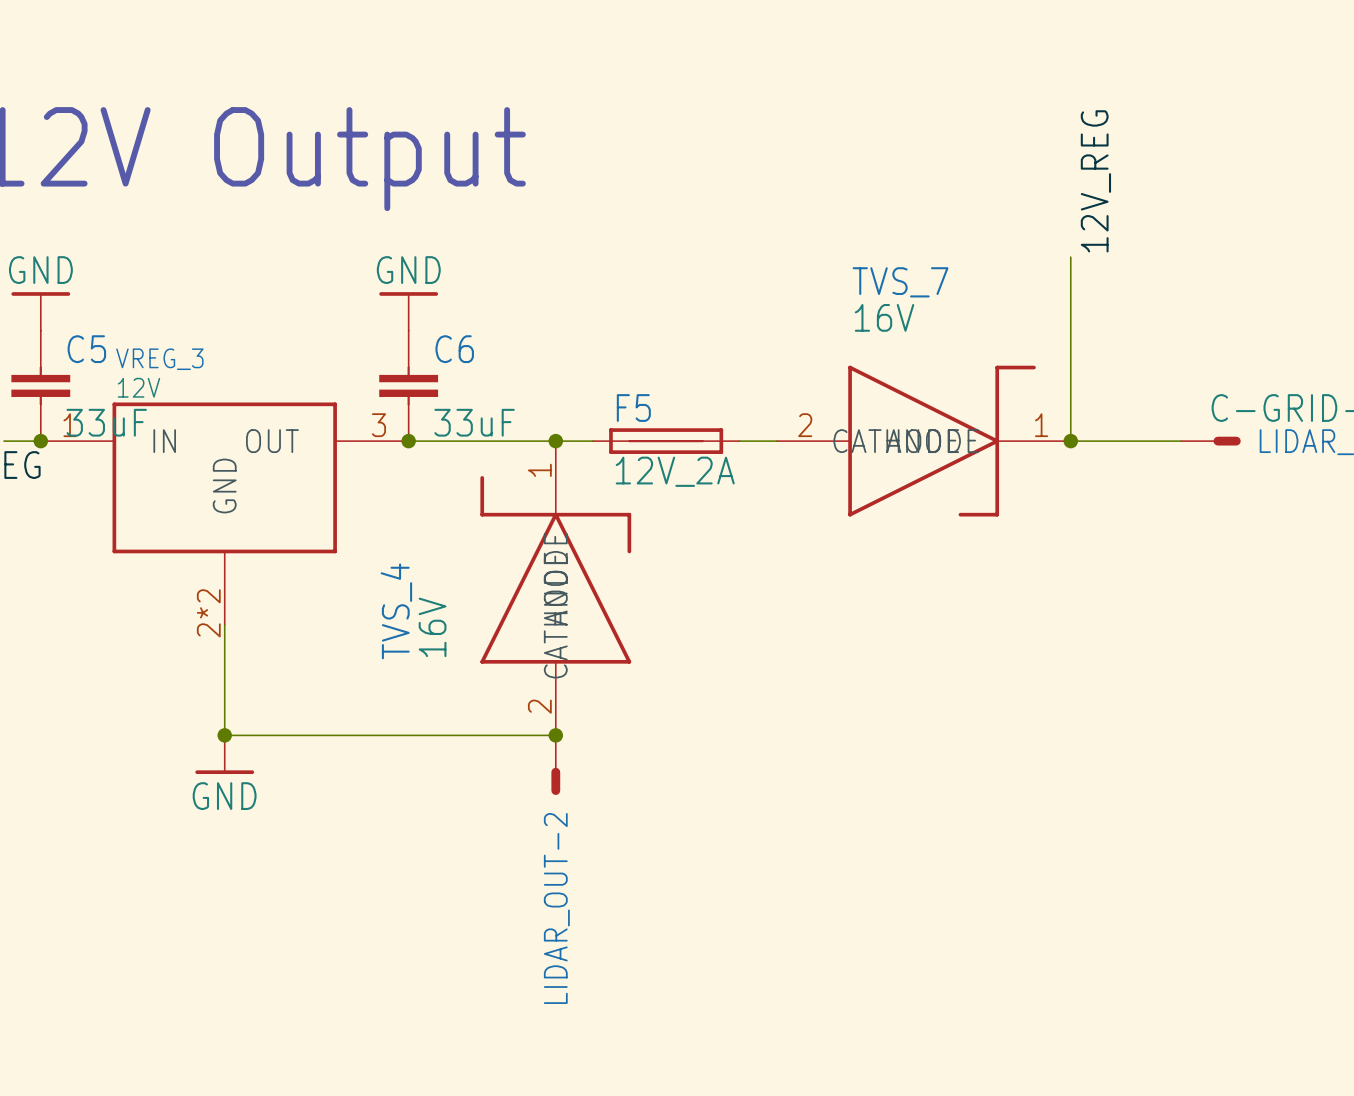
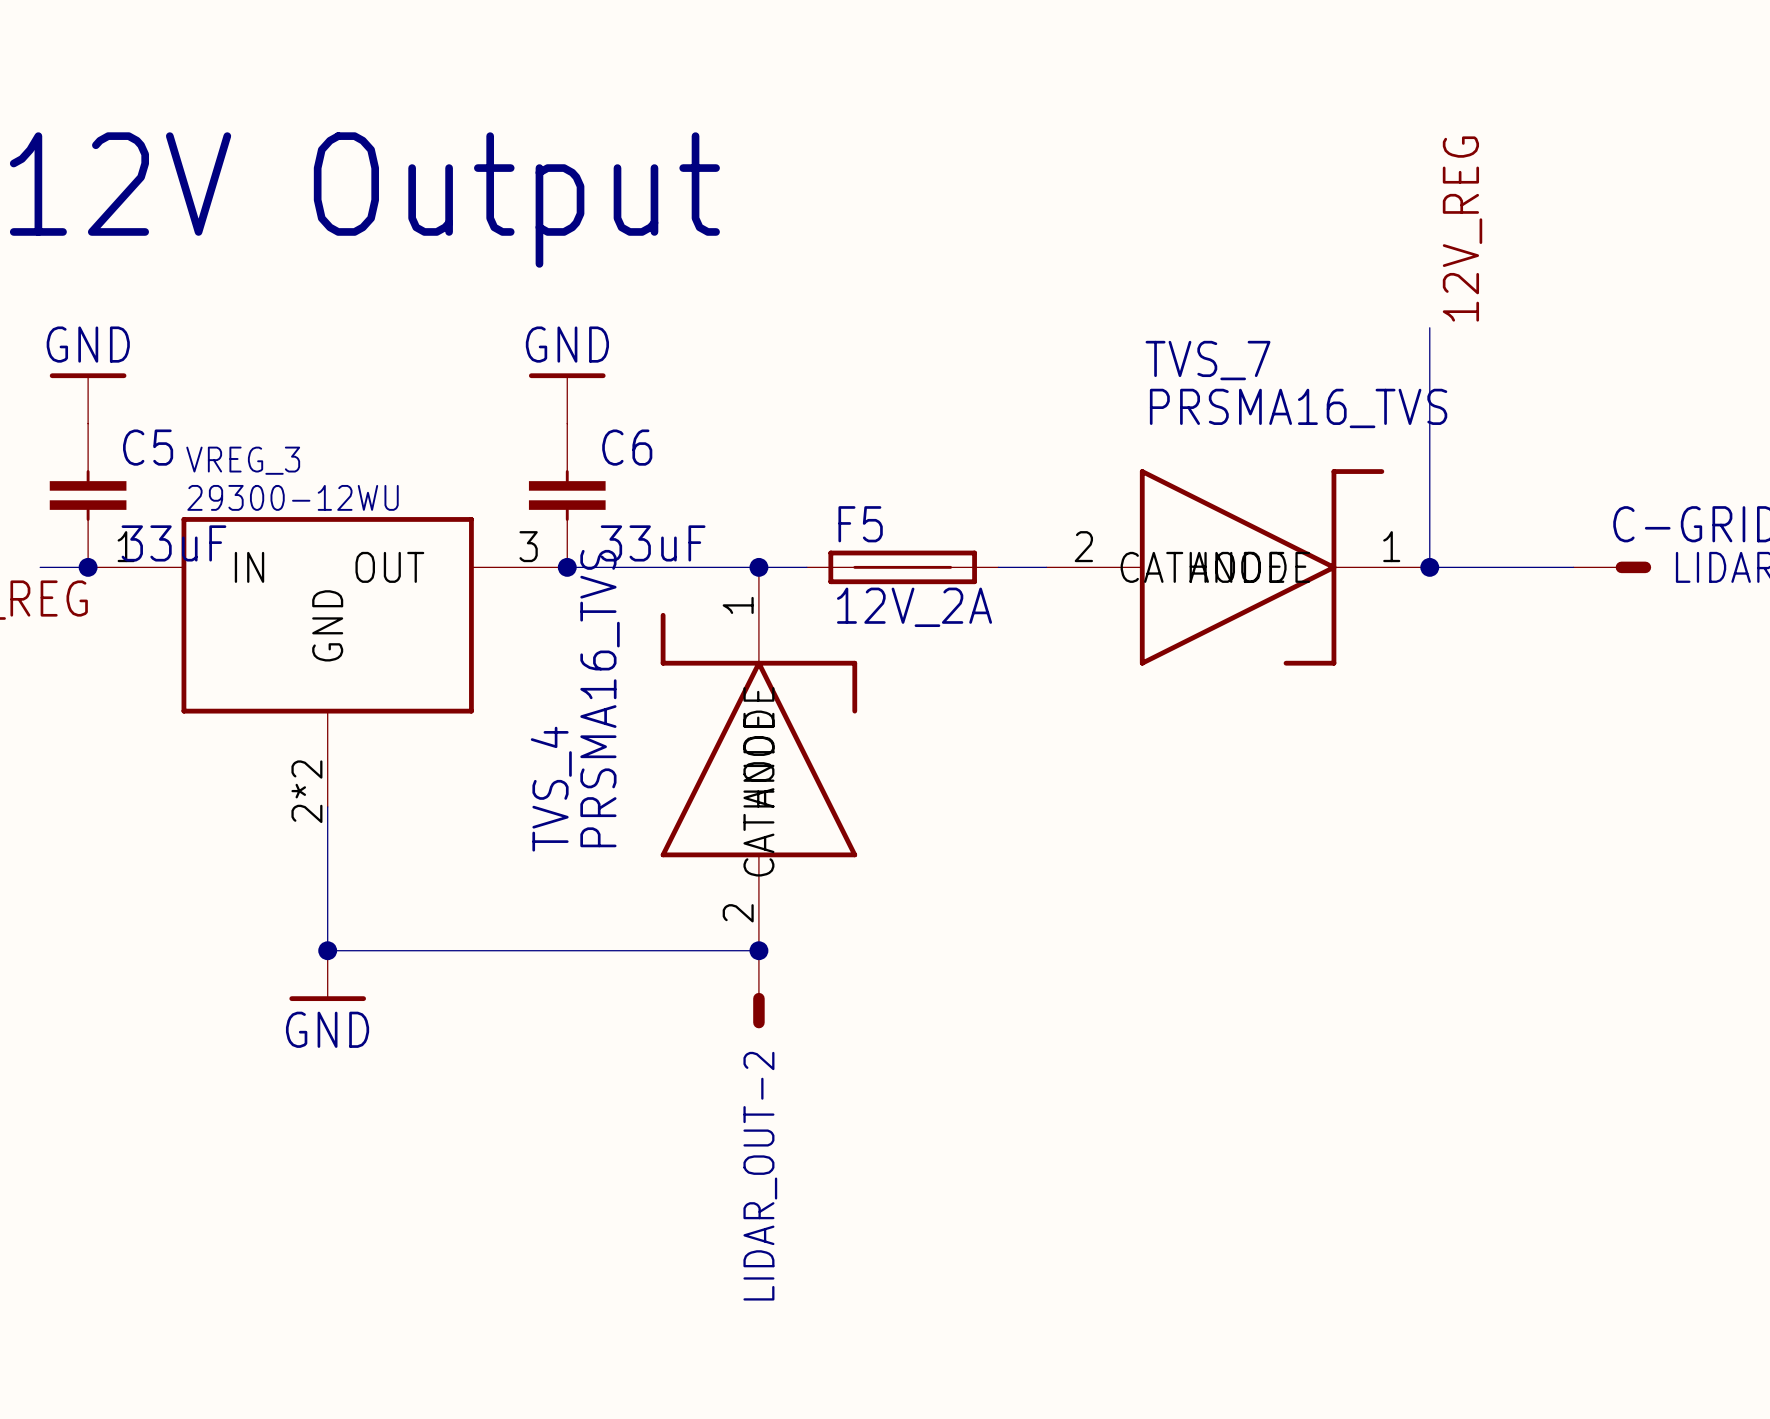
TVS_7 value: 16V (884, 317) -> PRSMA16_TVS (1298, 408)
VREG_3 value: 12V (138, 387) -> 29300-12WU (293, 497)
TVS_4 value: 16V (432, 627) -> PRSMA16_TVS (600, 698)

